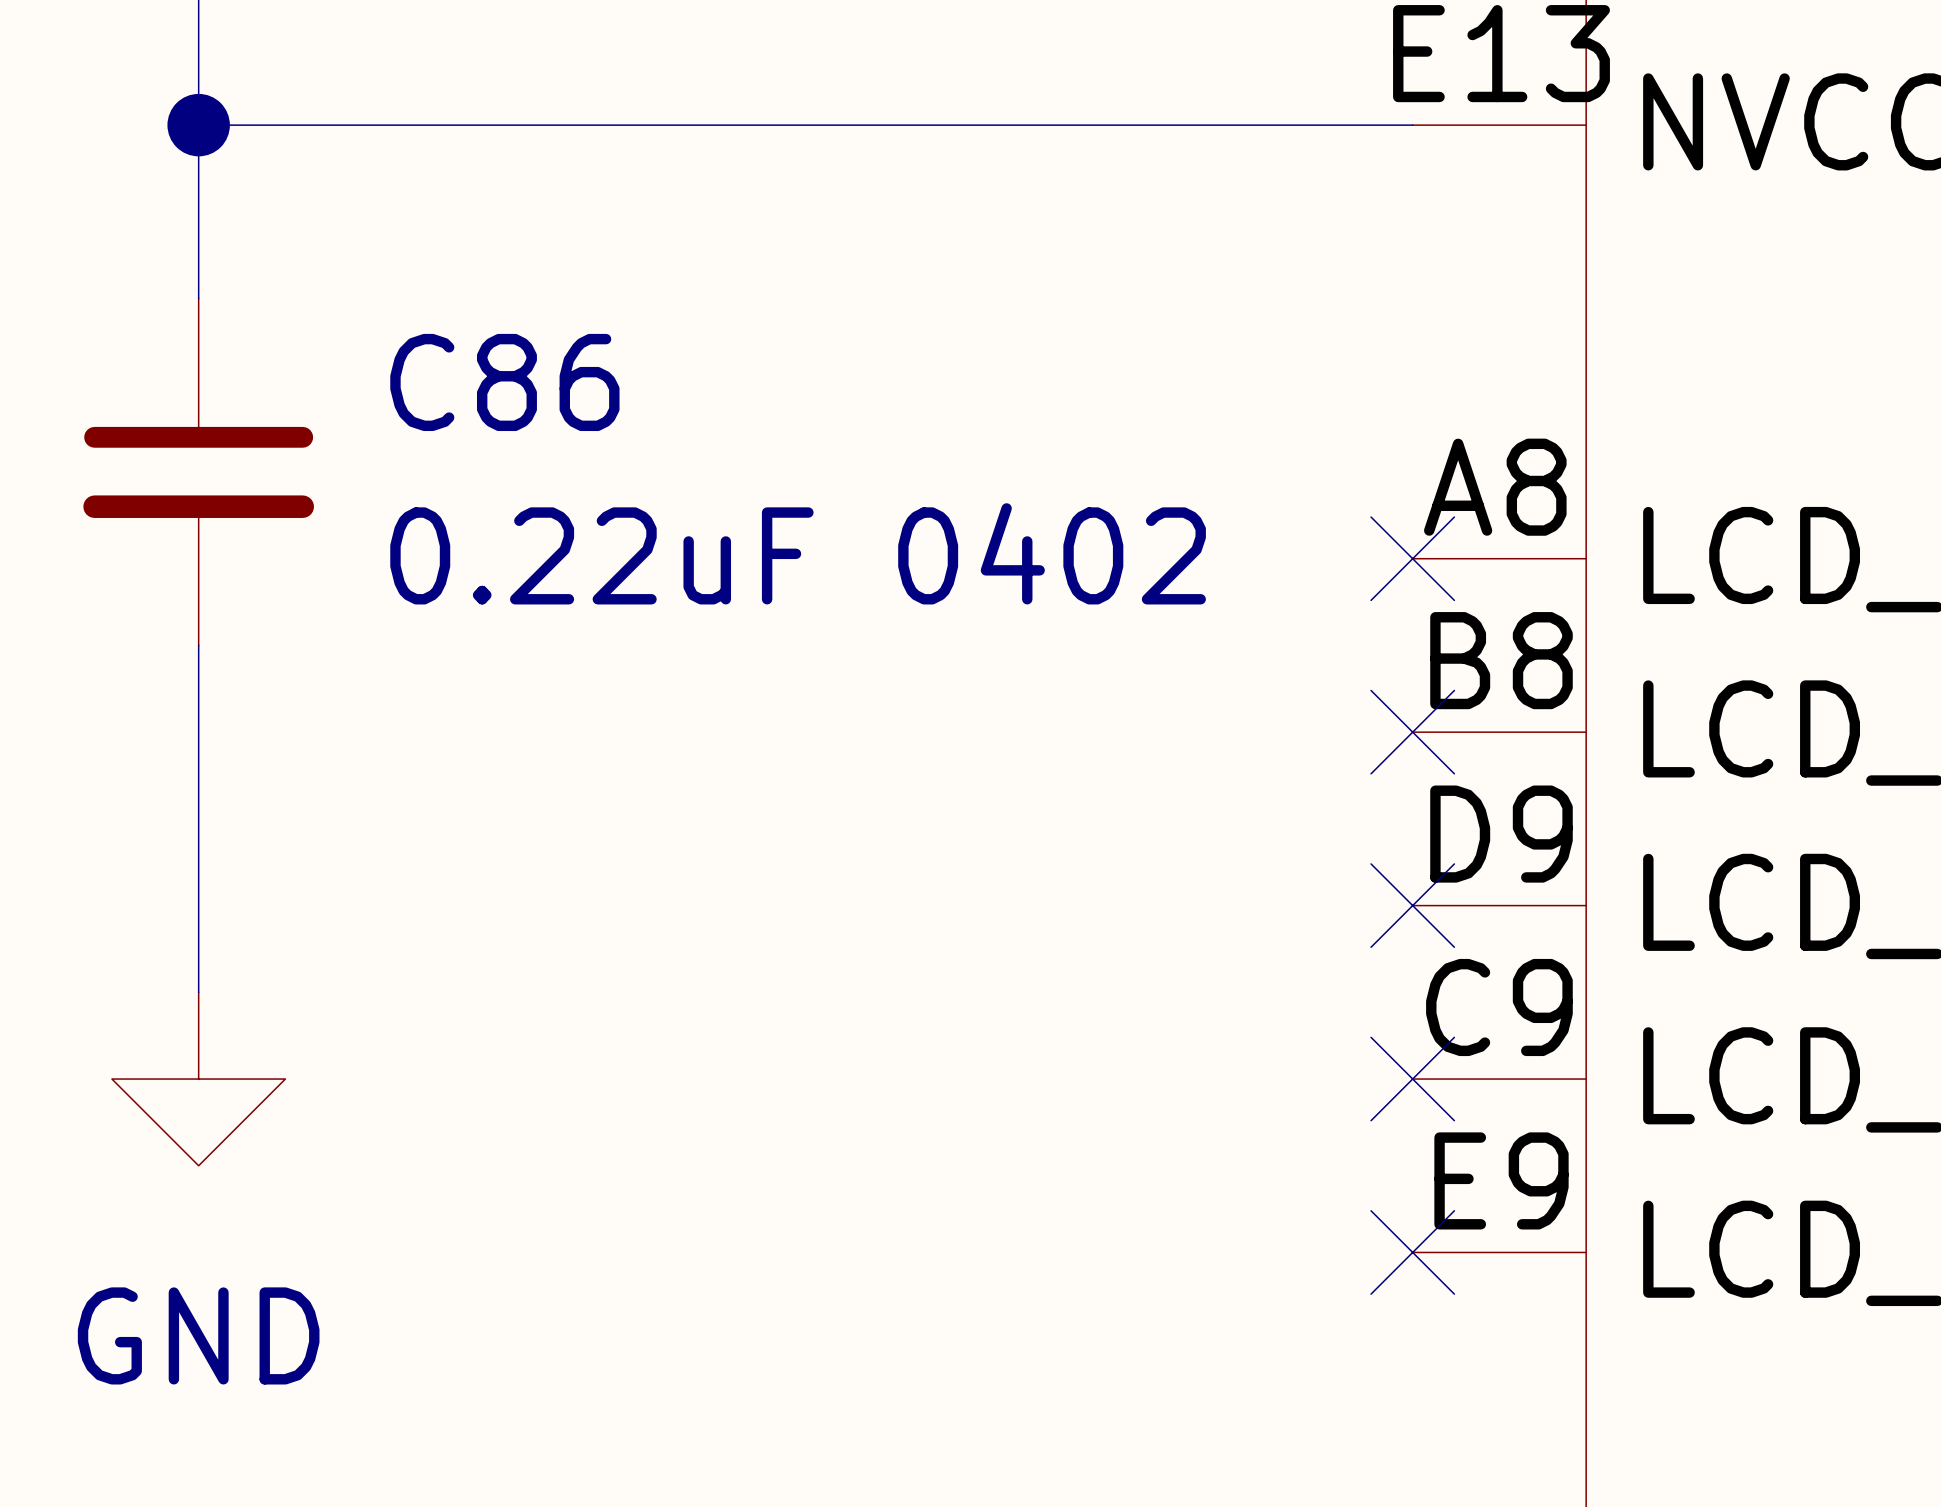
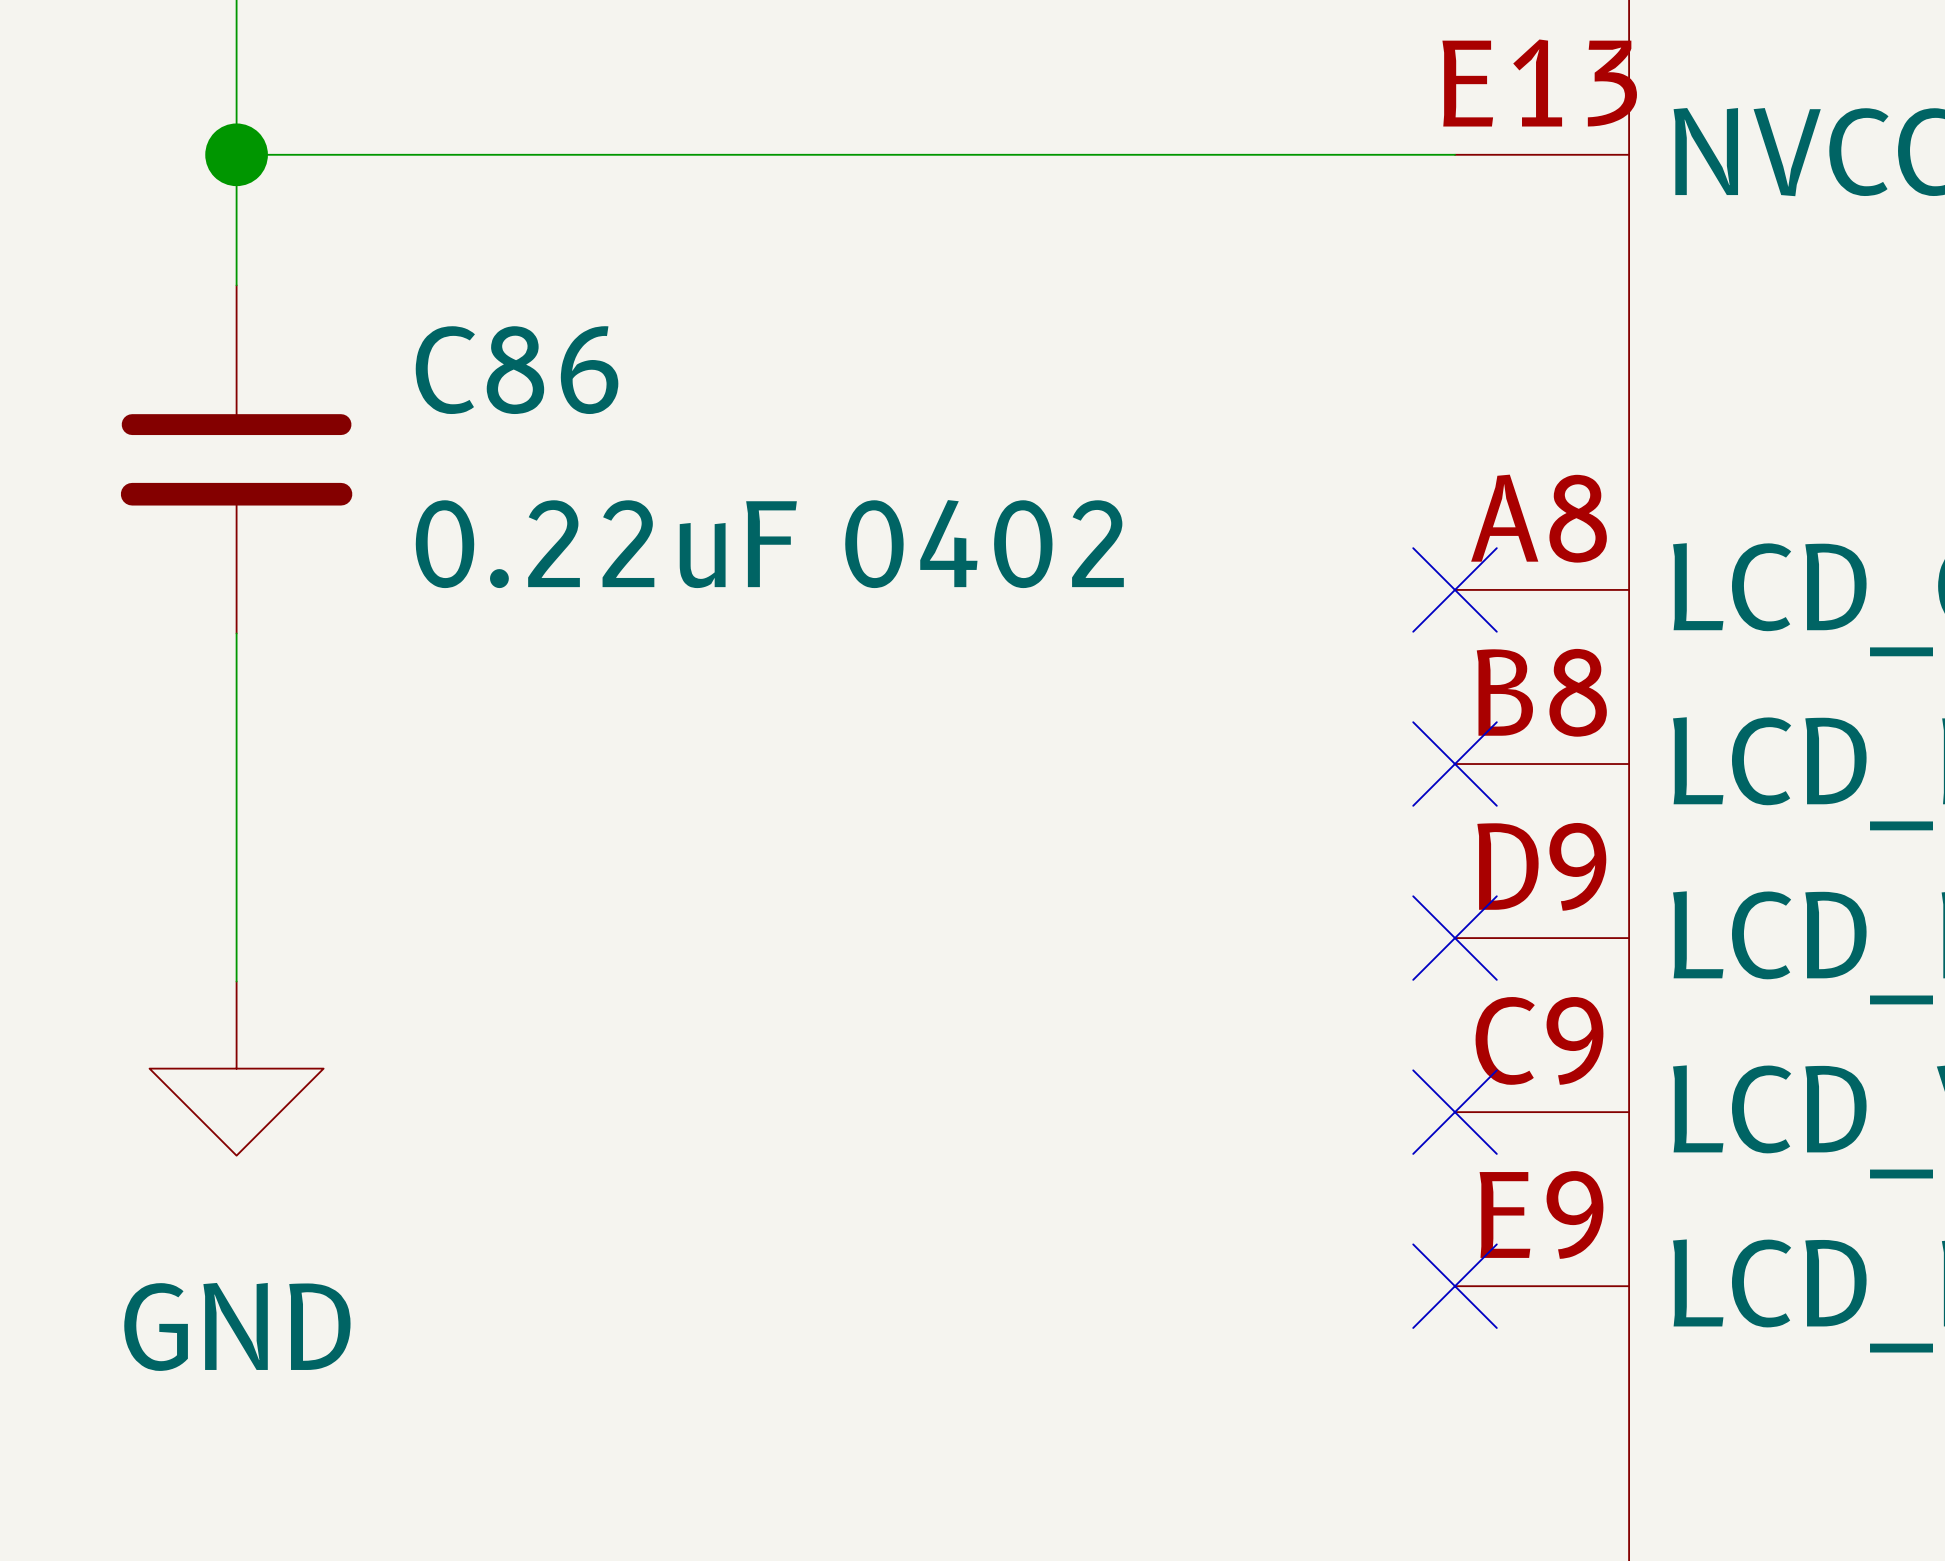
C86 position: (198, 472) -> (236, 459)
power symbol position: GND (198, 1079) -> GND (236, 1068)

